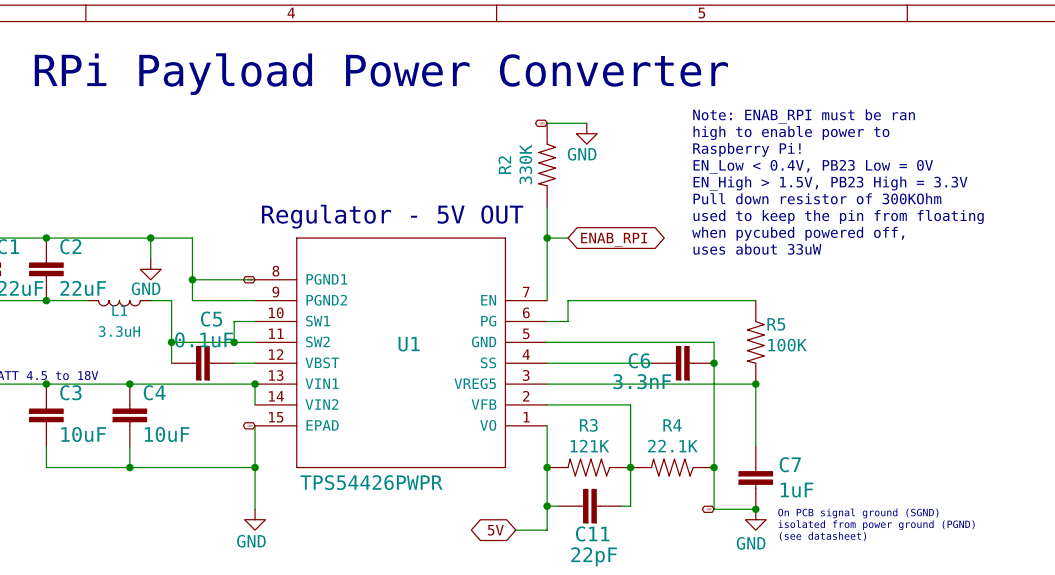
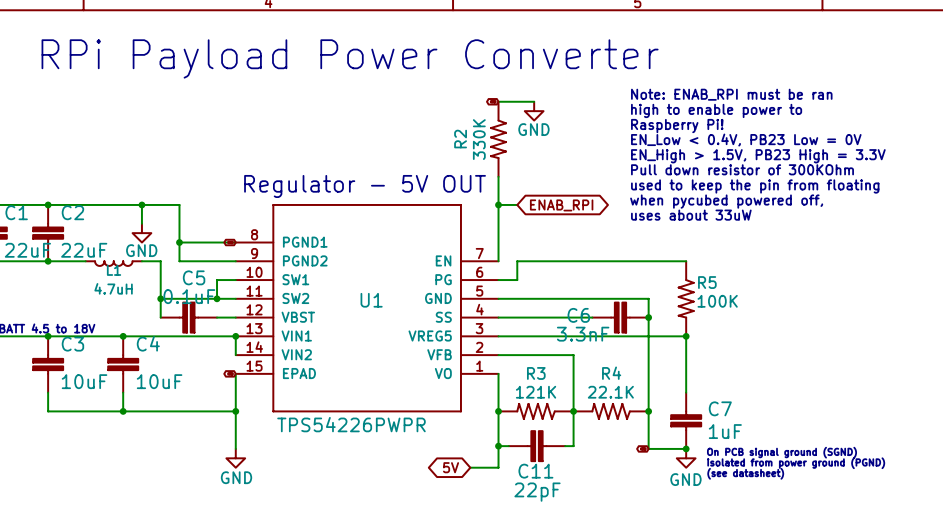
L1 value: 3.3uH (119, 331) -> 4.7uH (113, 288)
U1 value: TPS54426PWPR (371, 482) -> TPS54226PWPR (351, 424)

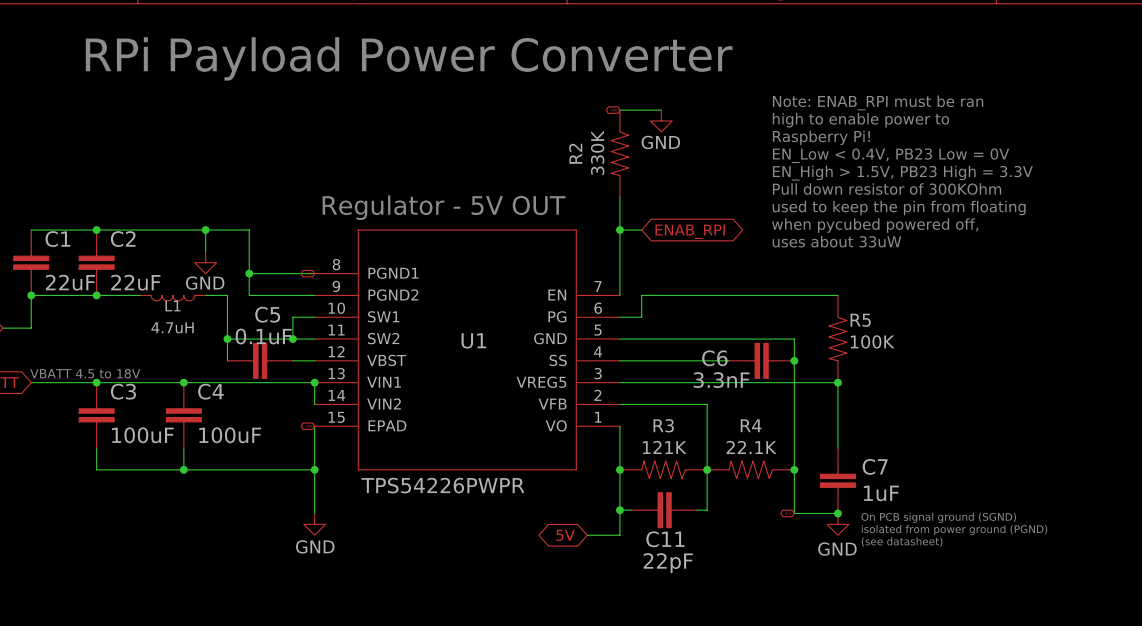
C3 value: 10uF (84, 381) -> 100uF (142, 435)
C4 value: 10uF (159, 381) -> 100uF (230, 435)

